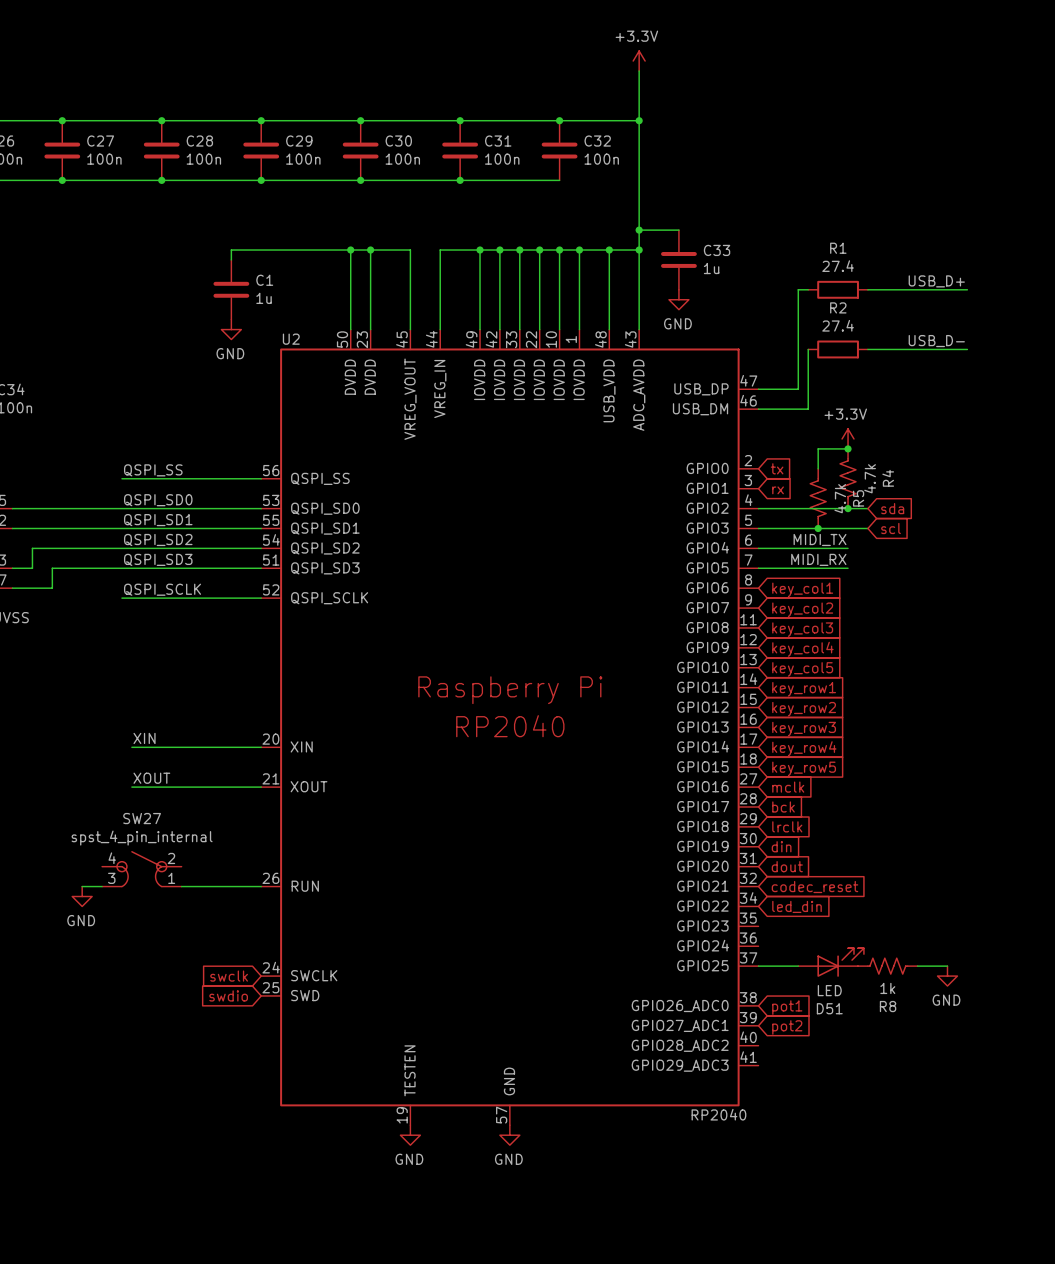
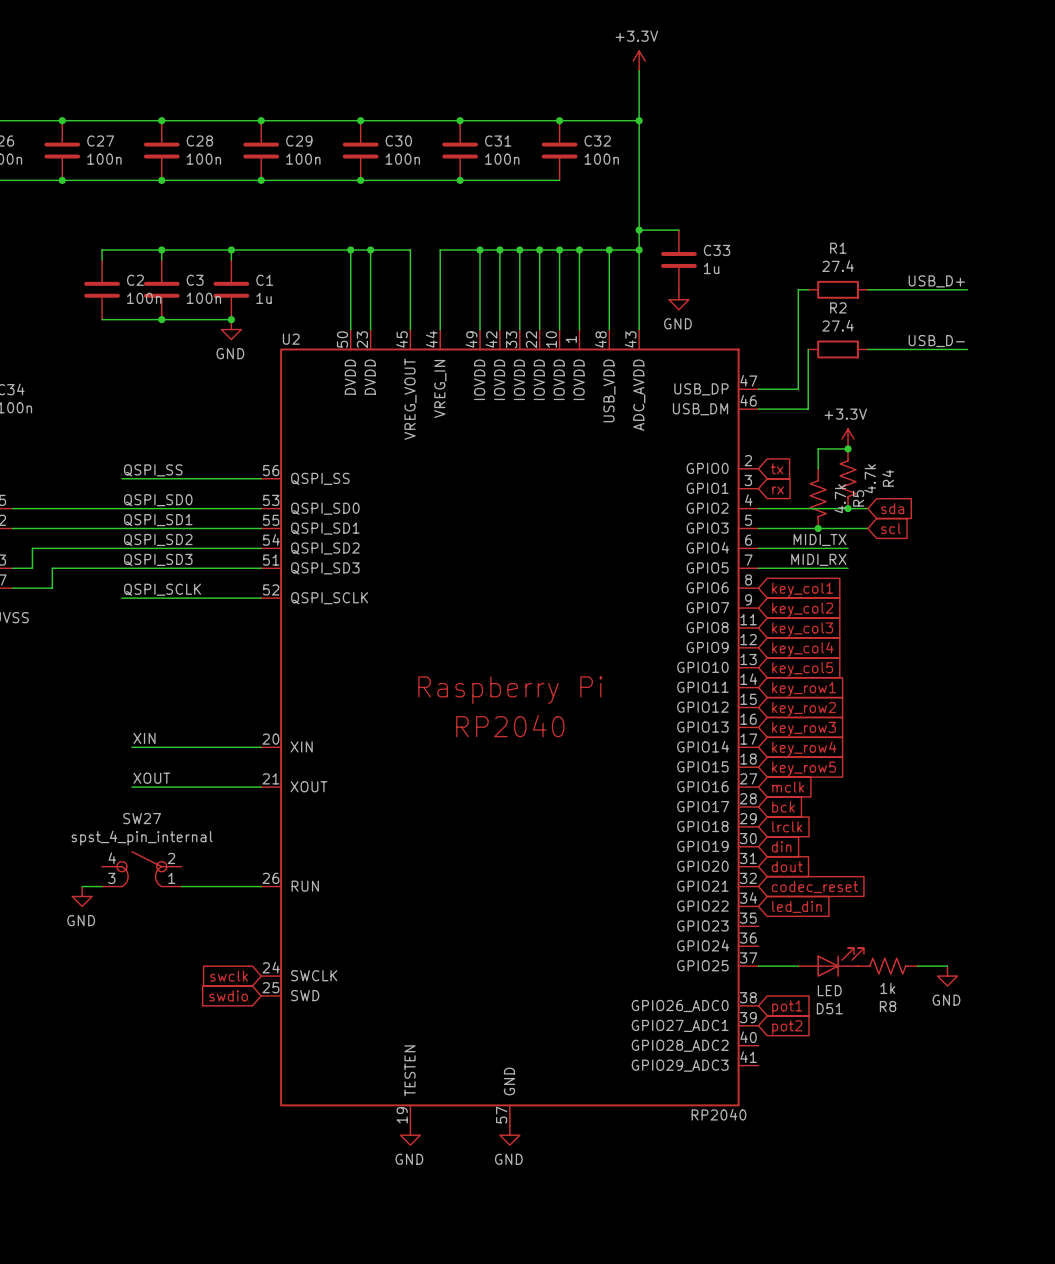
wire: none -> (161, 250) (161, 259)
junction: none -> (161, 250)
wire: none -> (231, 250) (102, 250) (102, 259)
junction: none -> (231, 250)
C2: none -> 100n (102, 289)
C3: none -> 100n (161, 289)
wire: none -> (102, 319) (231, 319)
junction: none -> (161, 319)
junction: none -> (231, 319)

